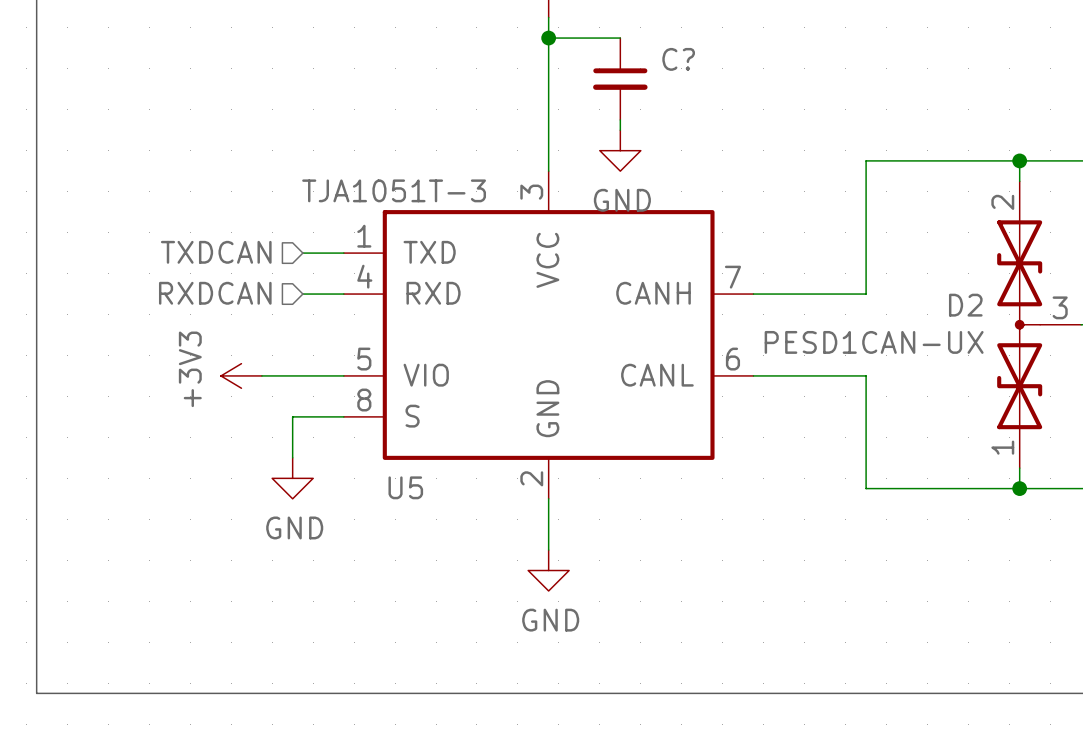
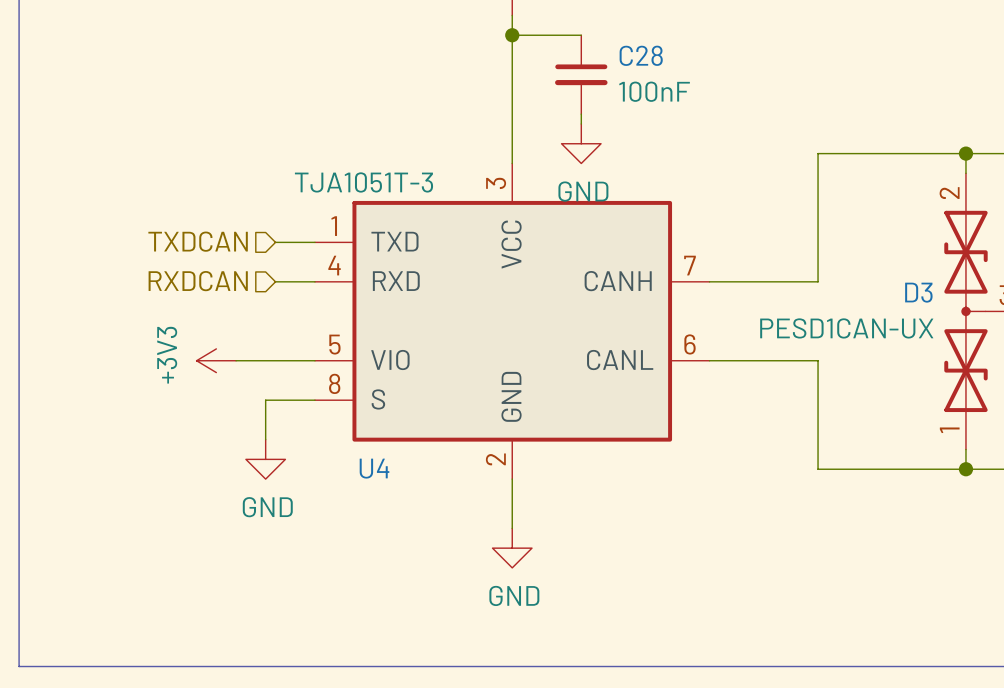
C? name: C? (678, 59) -> C28 (641, 55)
C? value: none -> 100nF (654, 91)
D2 name: D2 (965, 305) -> D3 (918, 292)
U5 name: U5 (405, 487) -> U4 (374, 468)

